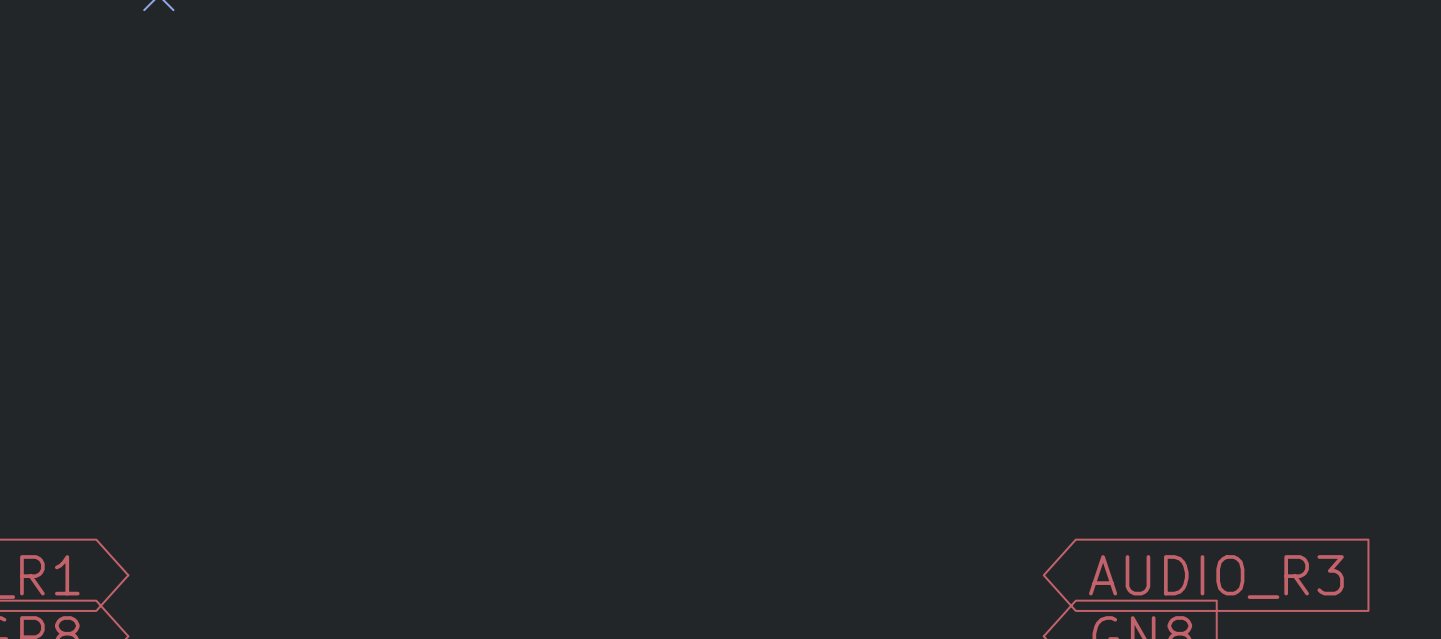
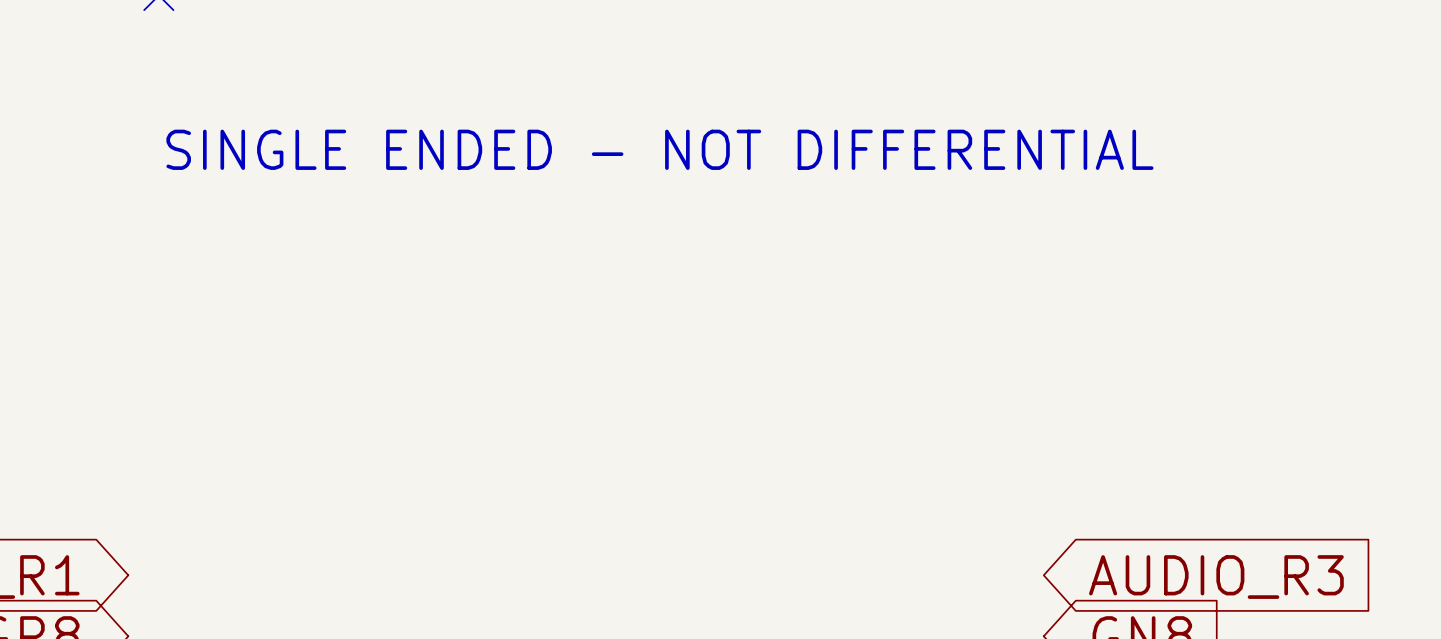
text: none -> SINGLE ENDED - NOT DIFFERENTIAL (659, 149)

